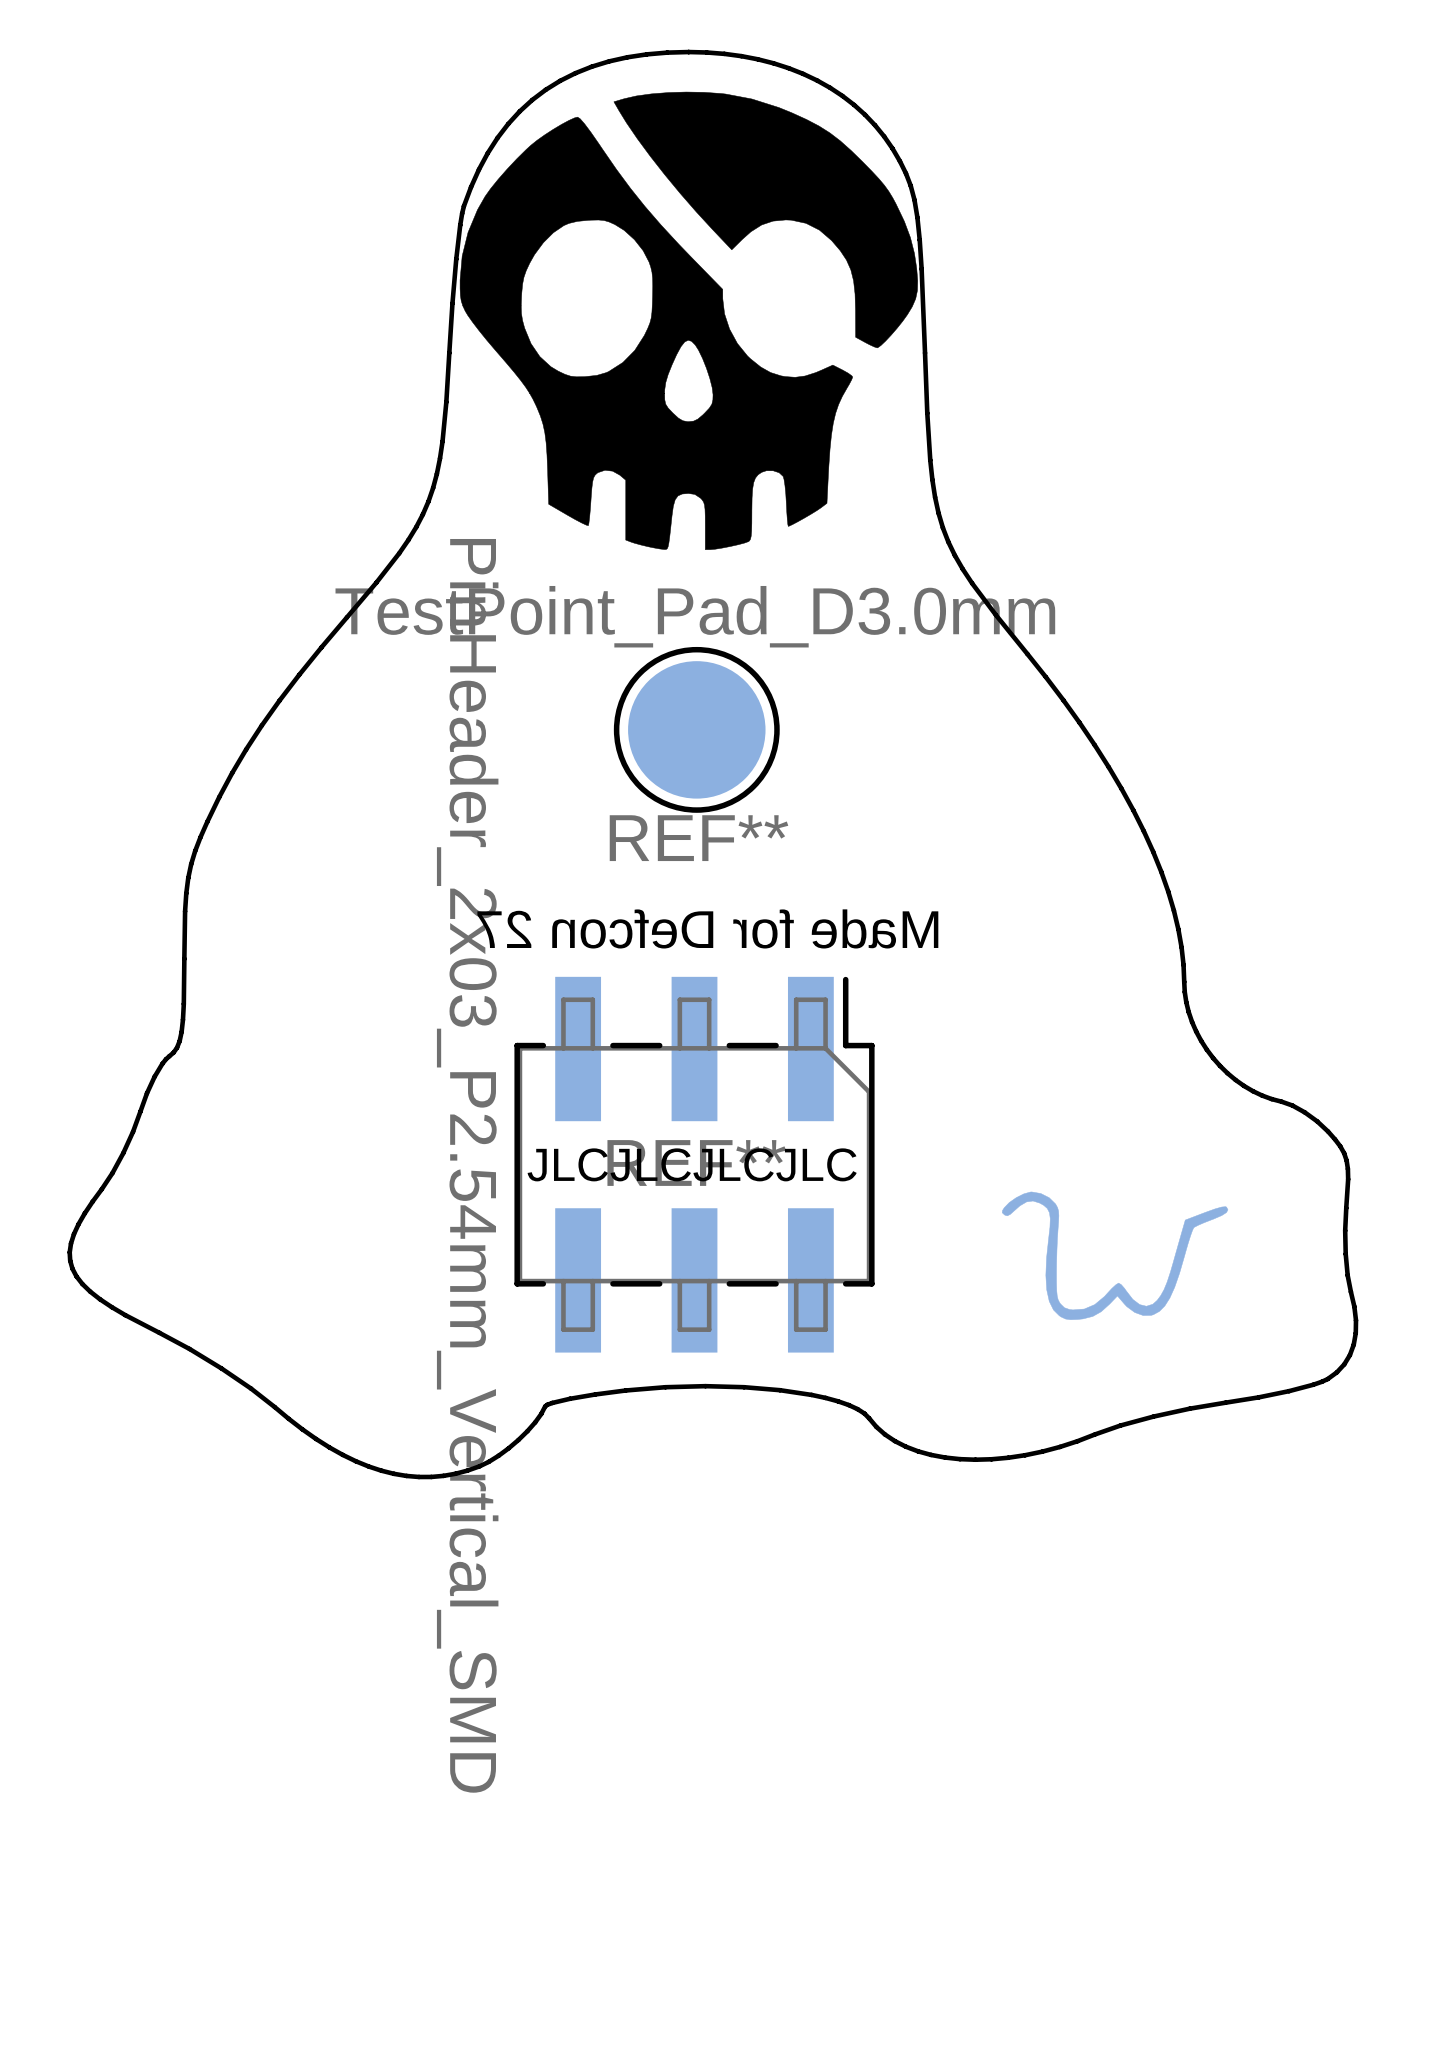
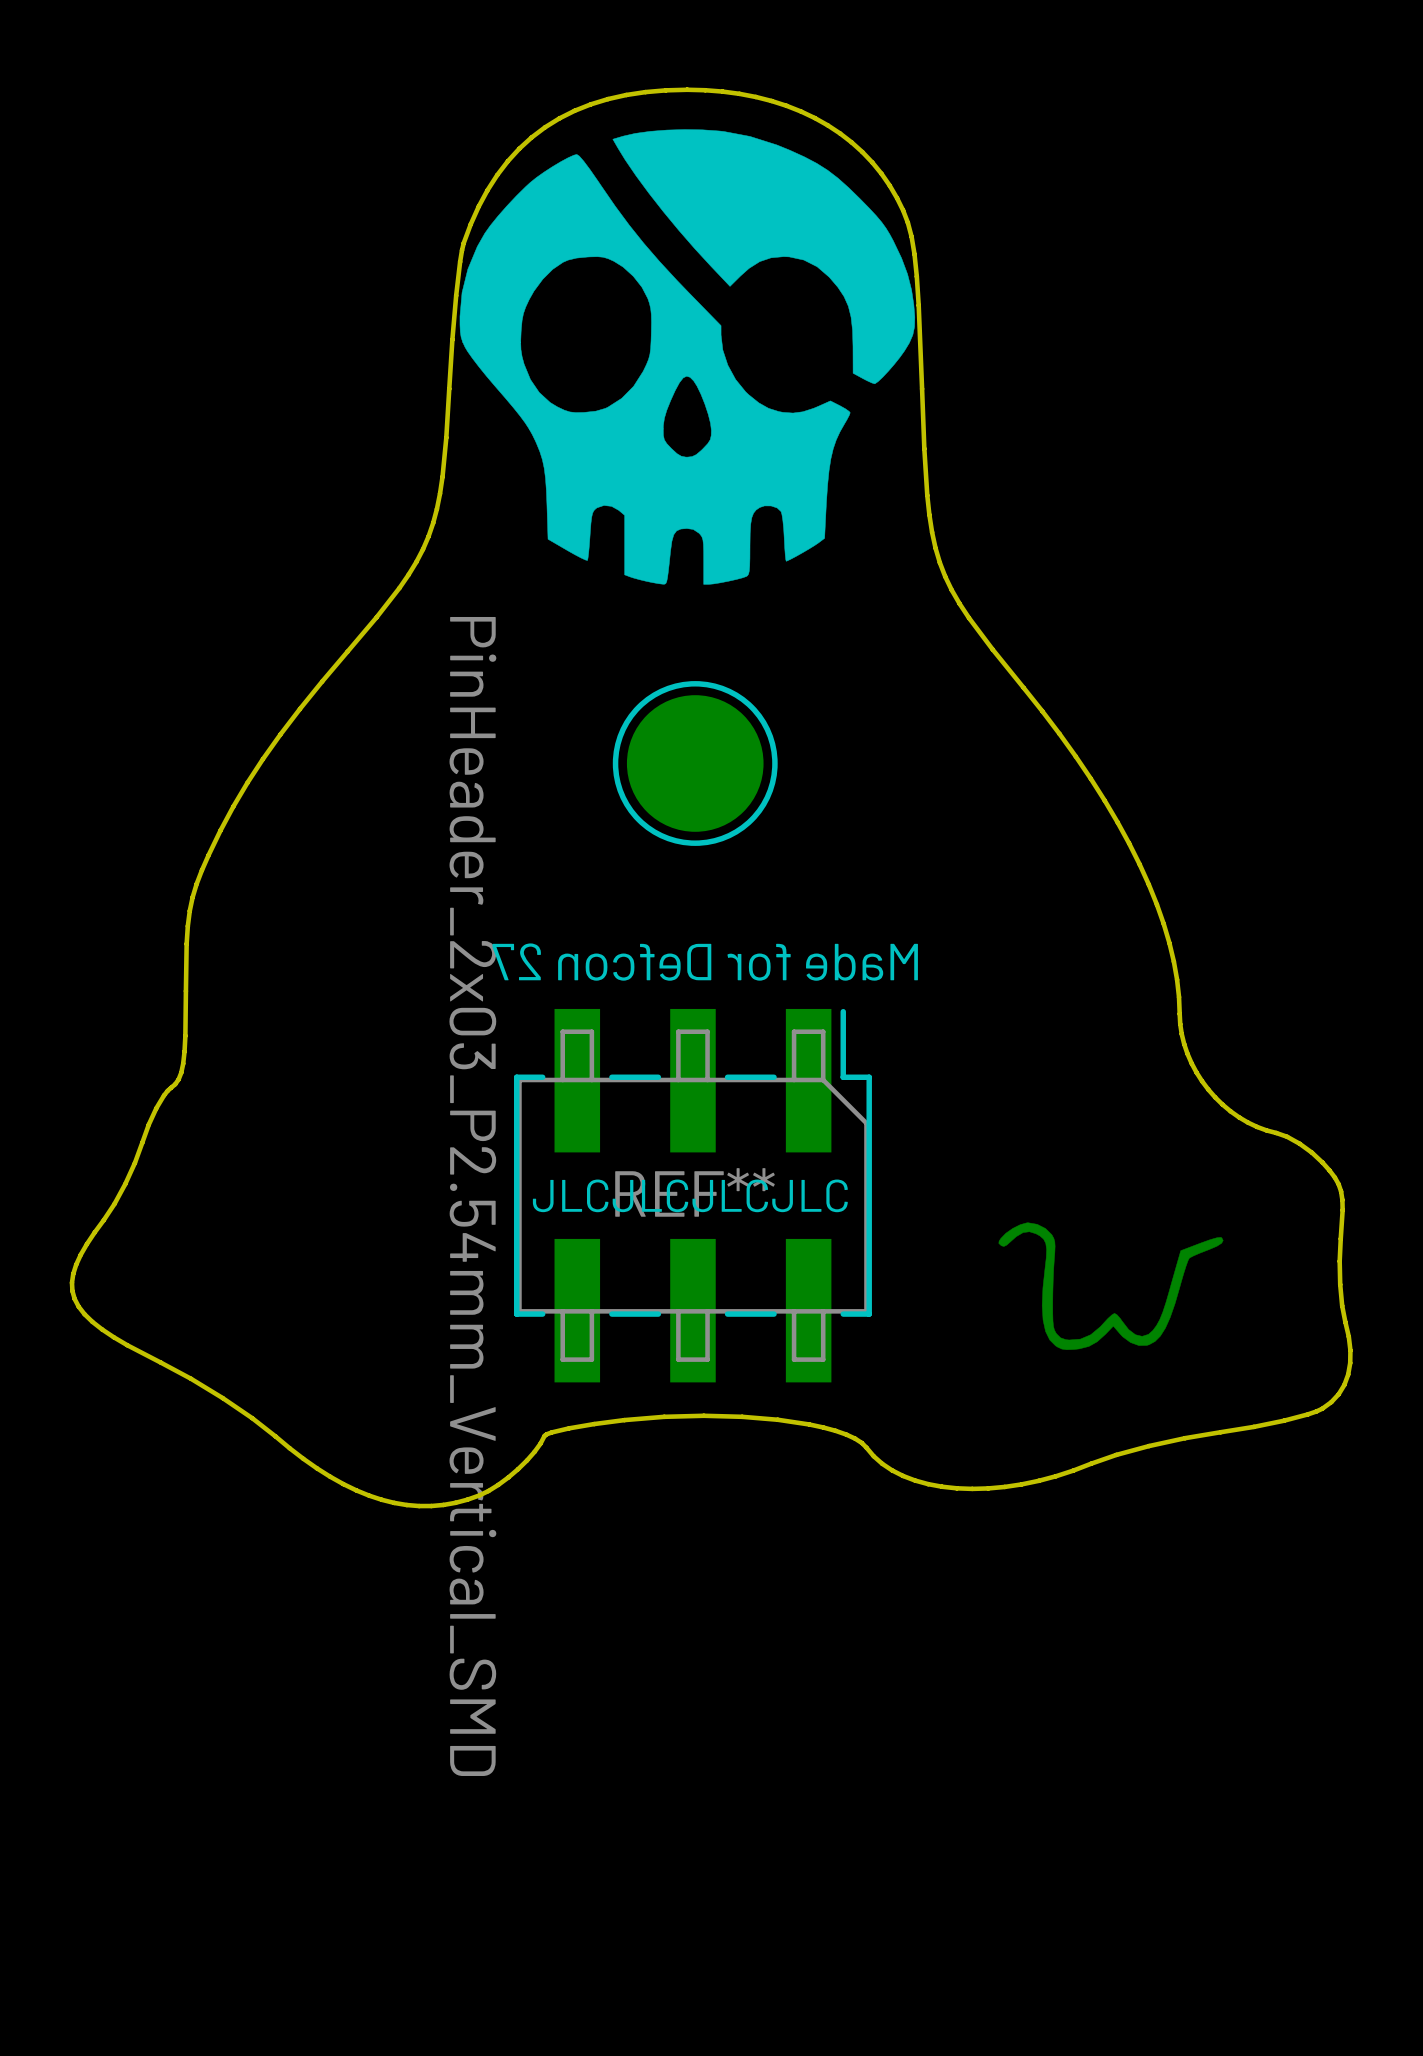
REF** value: TestPoint_Pad_D3.0mm (695, 616) -> none
REF** name: REF** (699, 838) -> none

